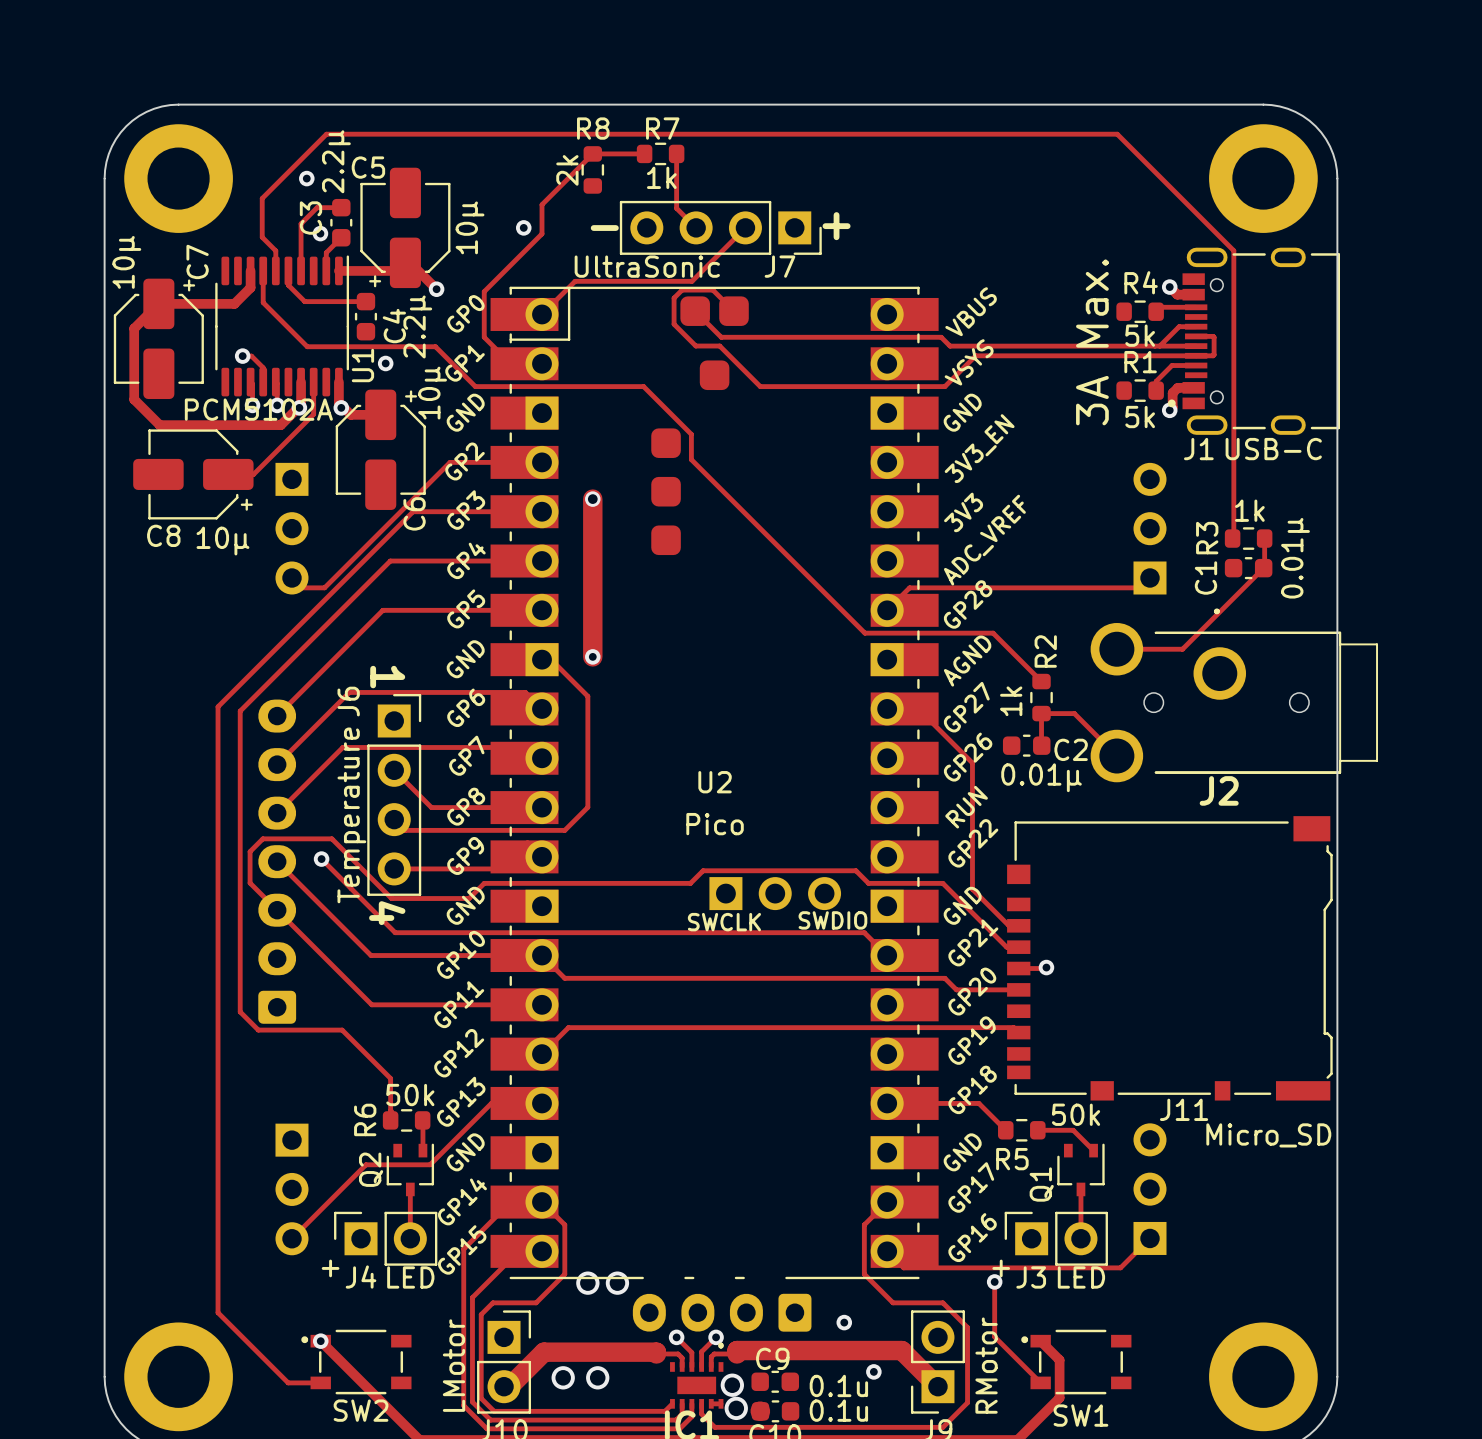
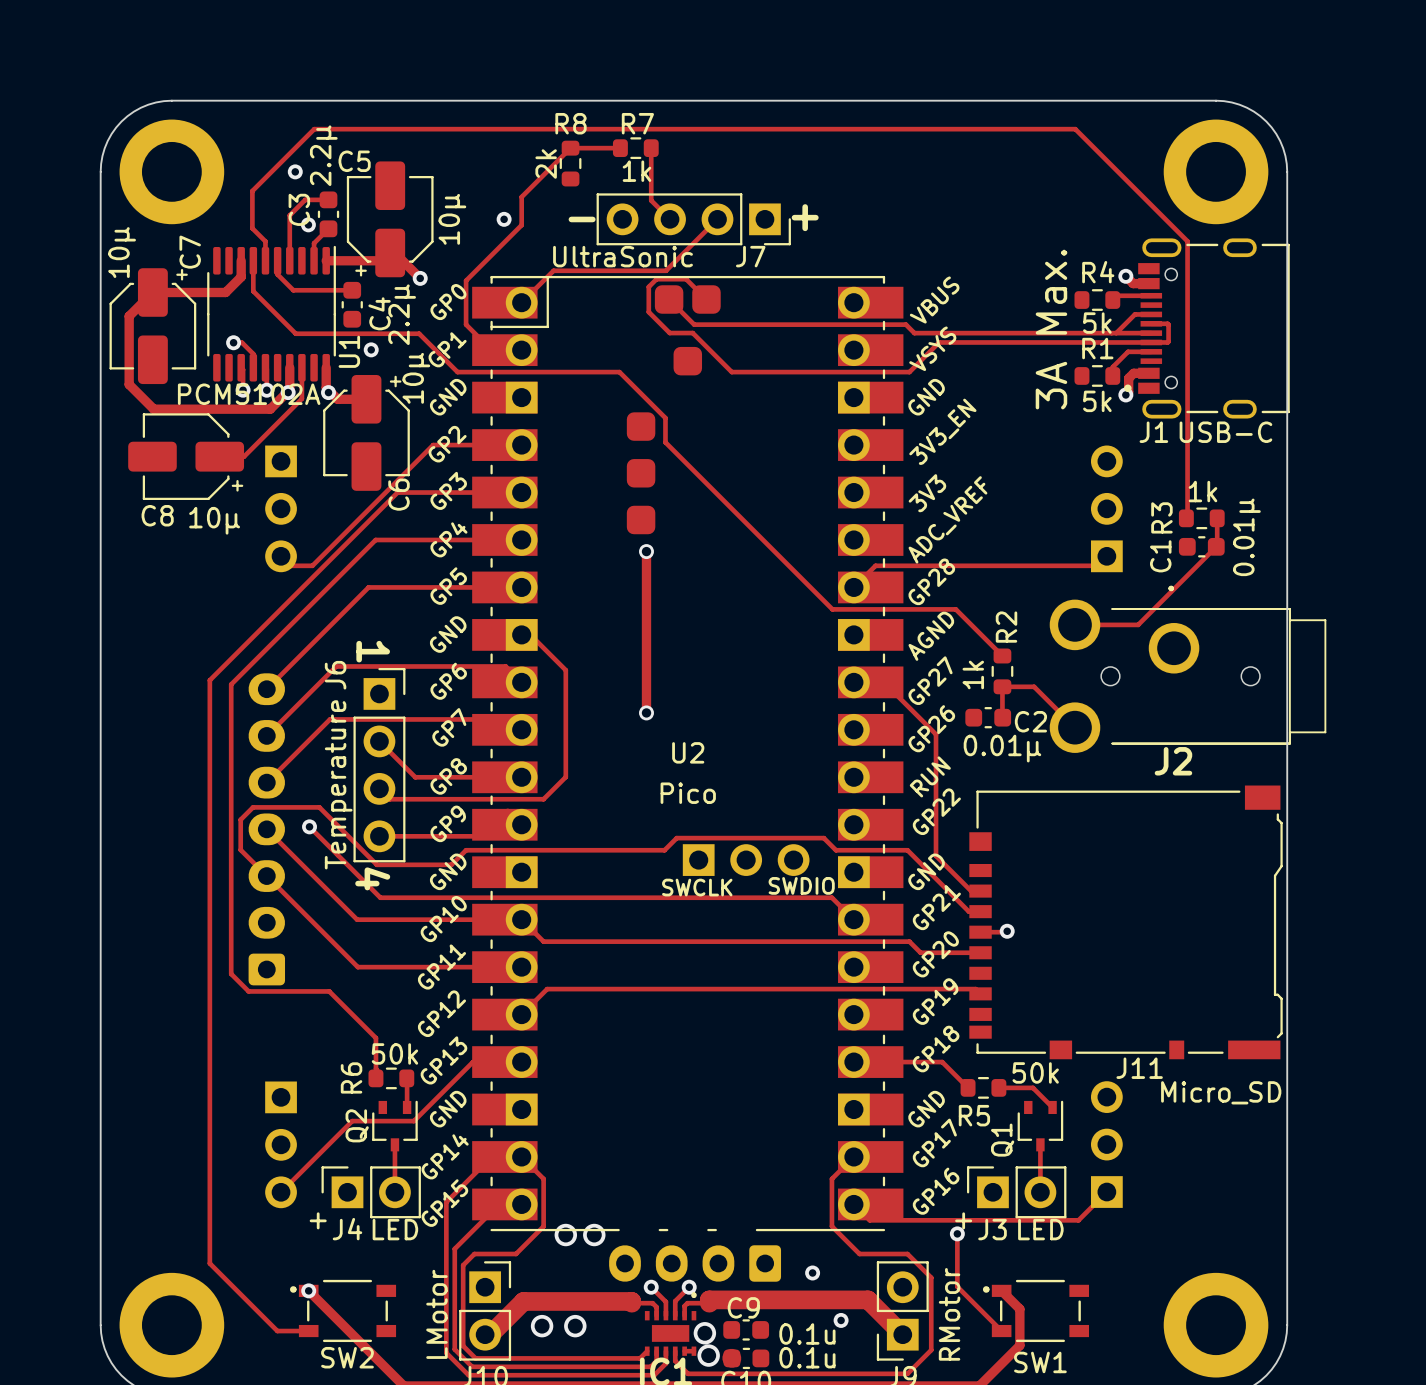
track: (592, 499) (592, 656) -> none
via position: (592, 499) -> (646, 551)
track: none -> (646, 551) (646, 712)
via: (592, 656) -> none
via: none -> (646, 712)

